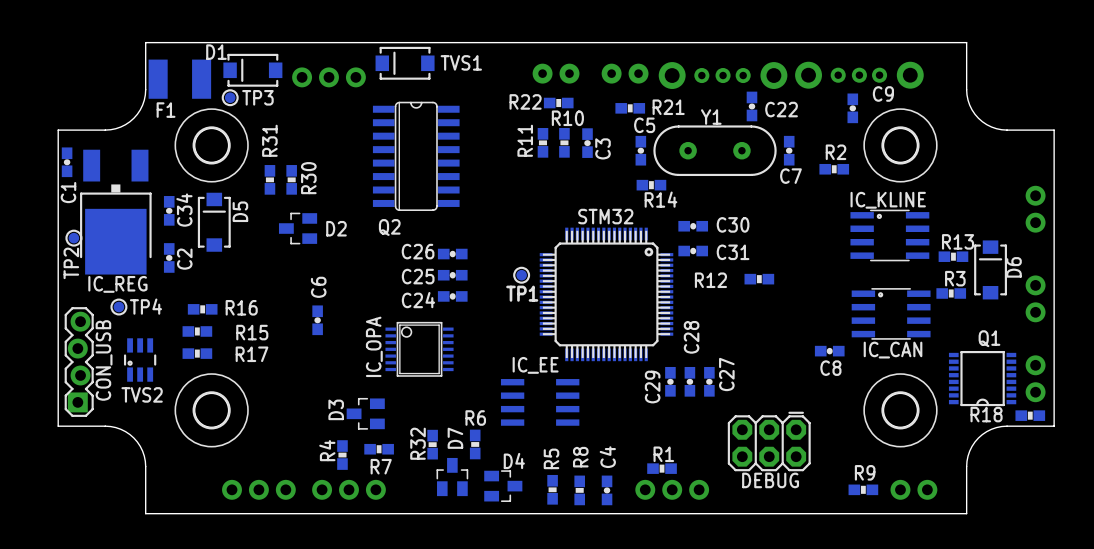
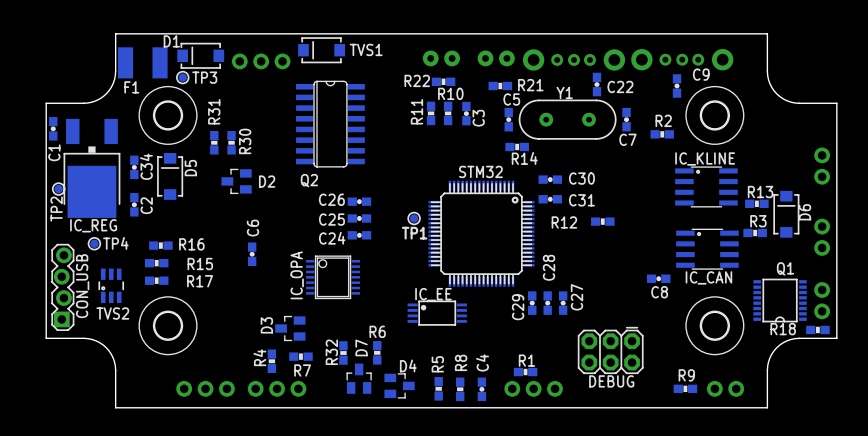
IC_EE: none -> (437, 313)
IC_EE: (540, 402) -> none

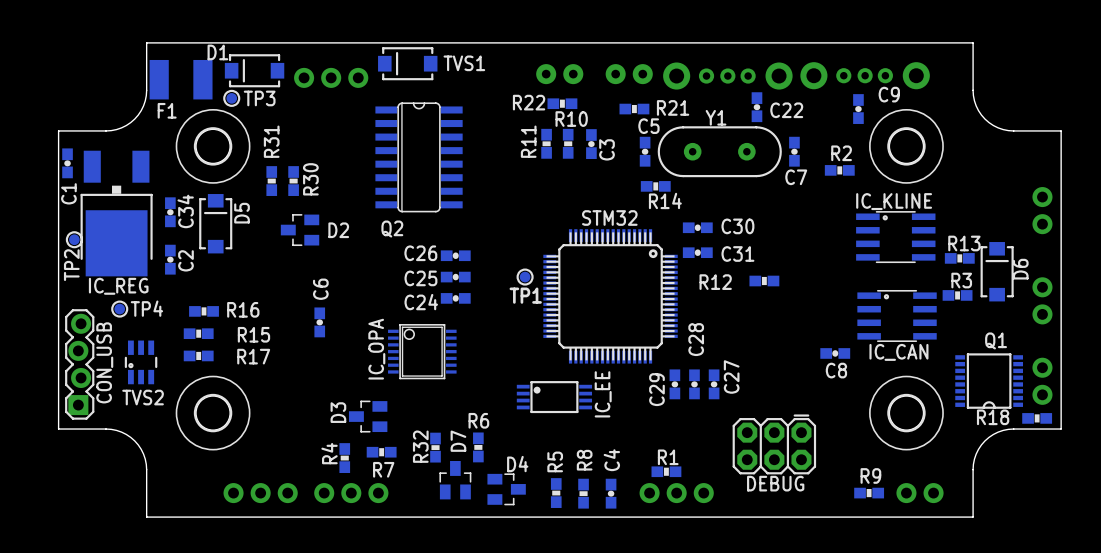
IC_EE name rotation: 0° (433, 294) -> 90° counterclockwise (603, 394)

